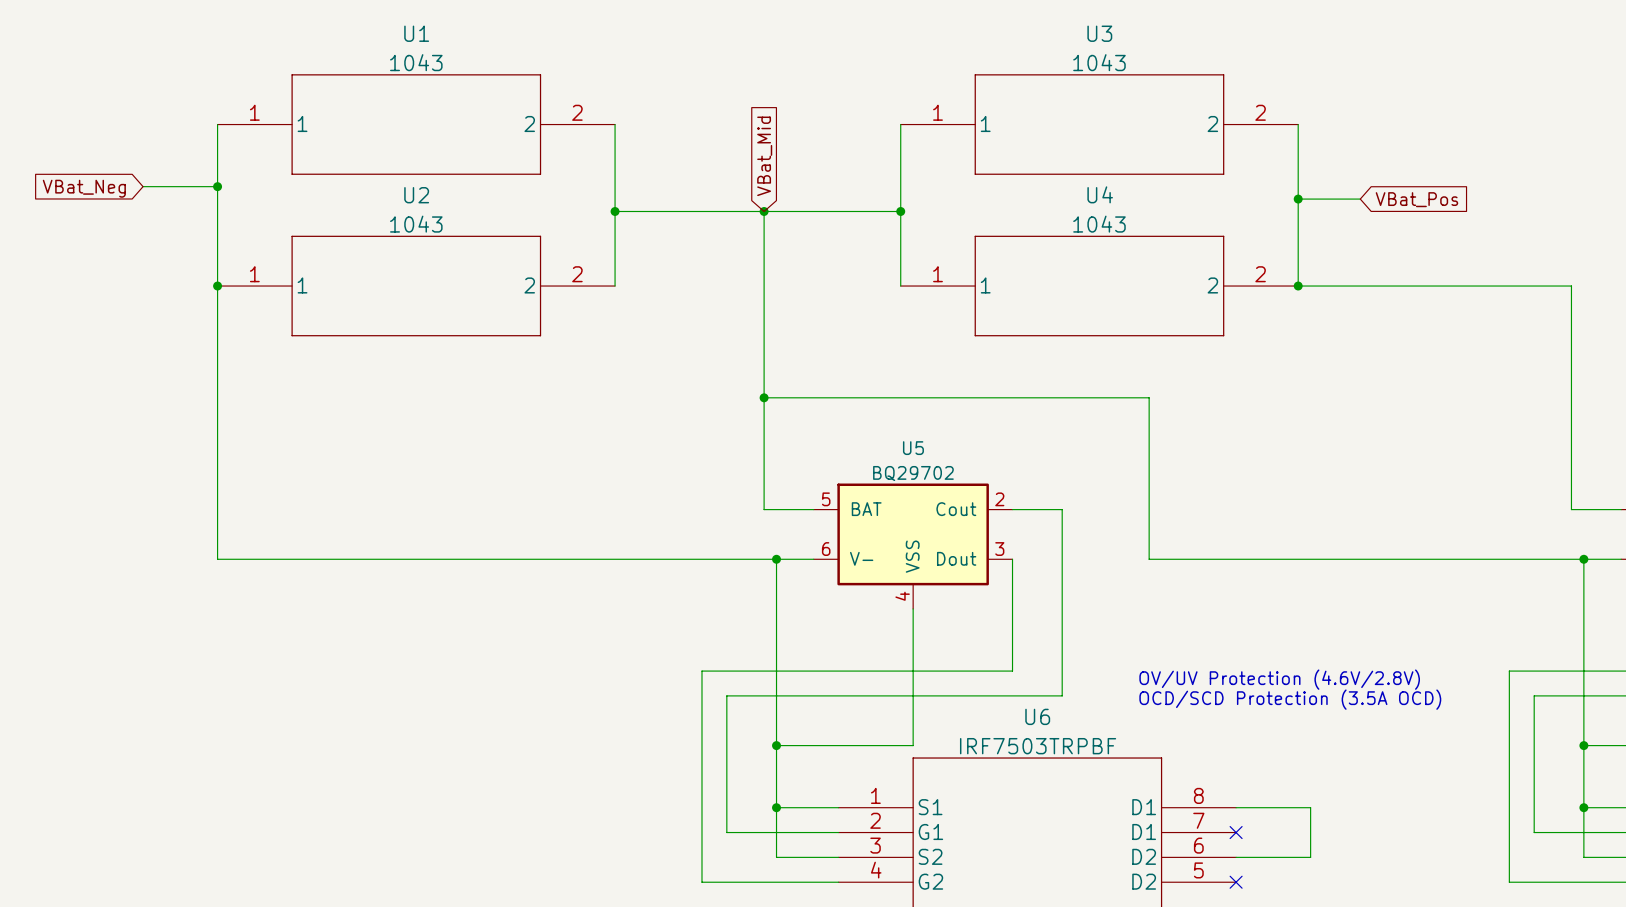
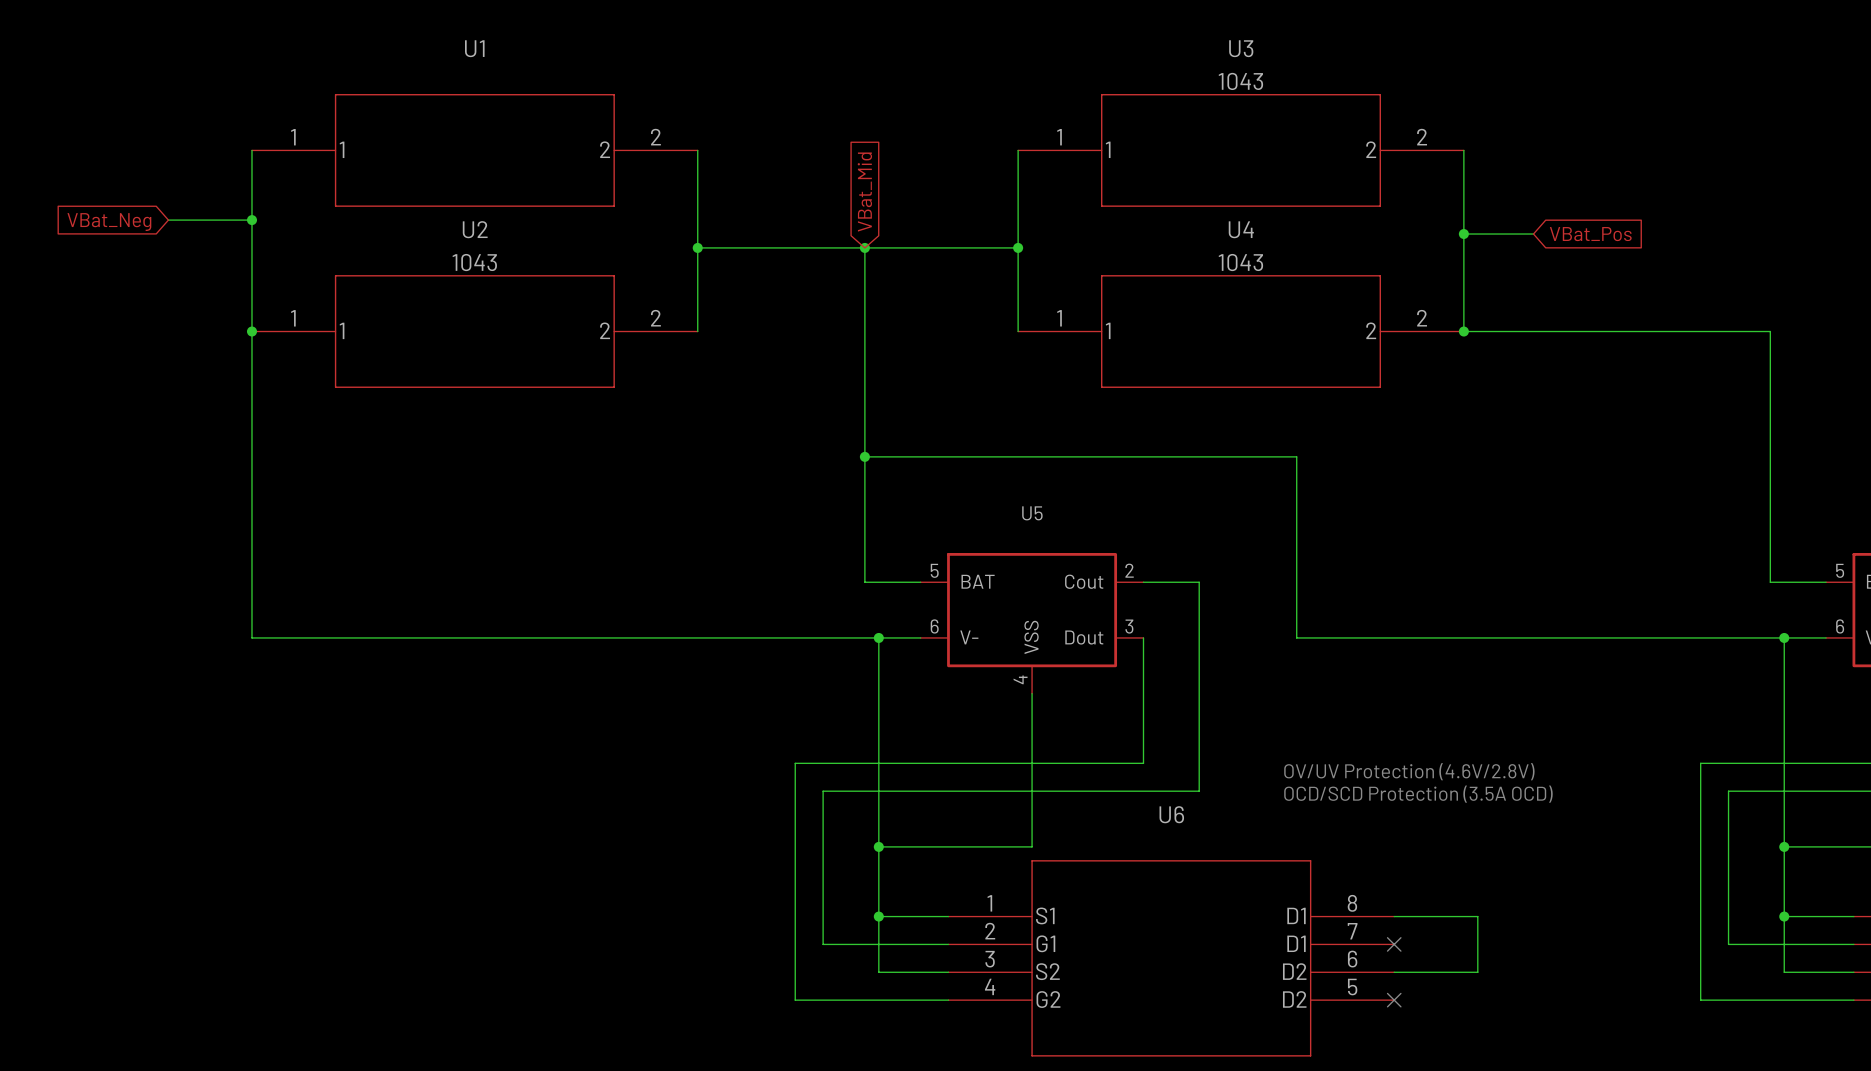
U1 value: 1043 (416, 62) -> none
U5 value: BQ29702 (913, 473) -> none
U6 value: IRF7503TRPBF (1038, 746) -> none

